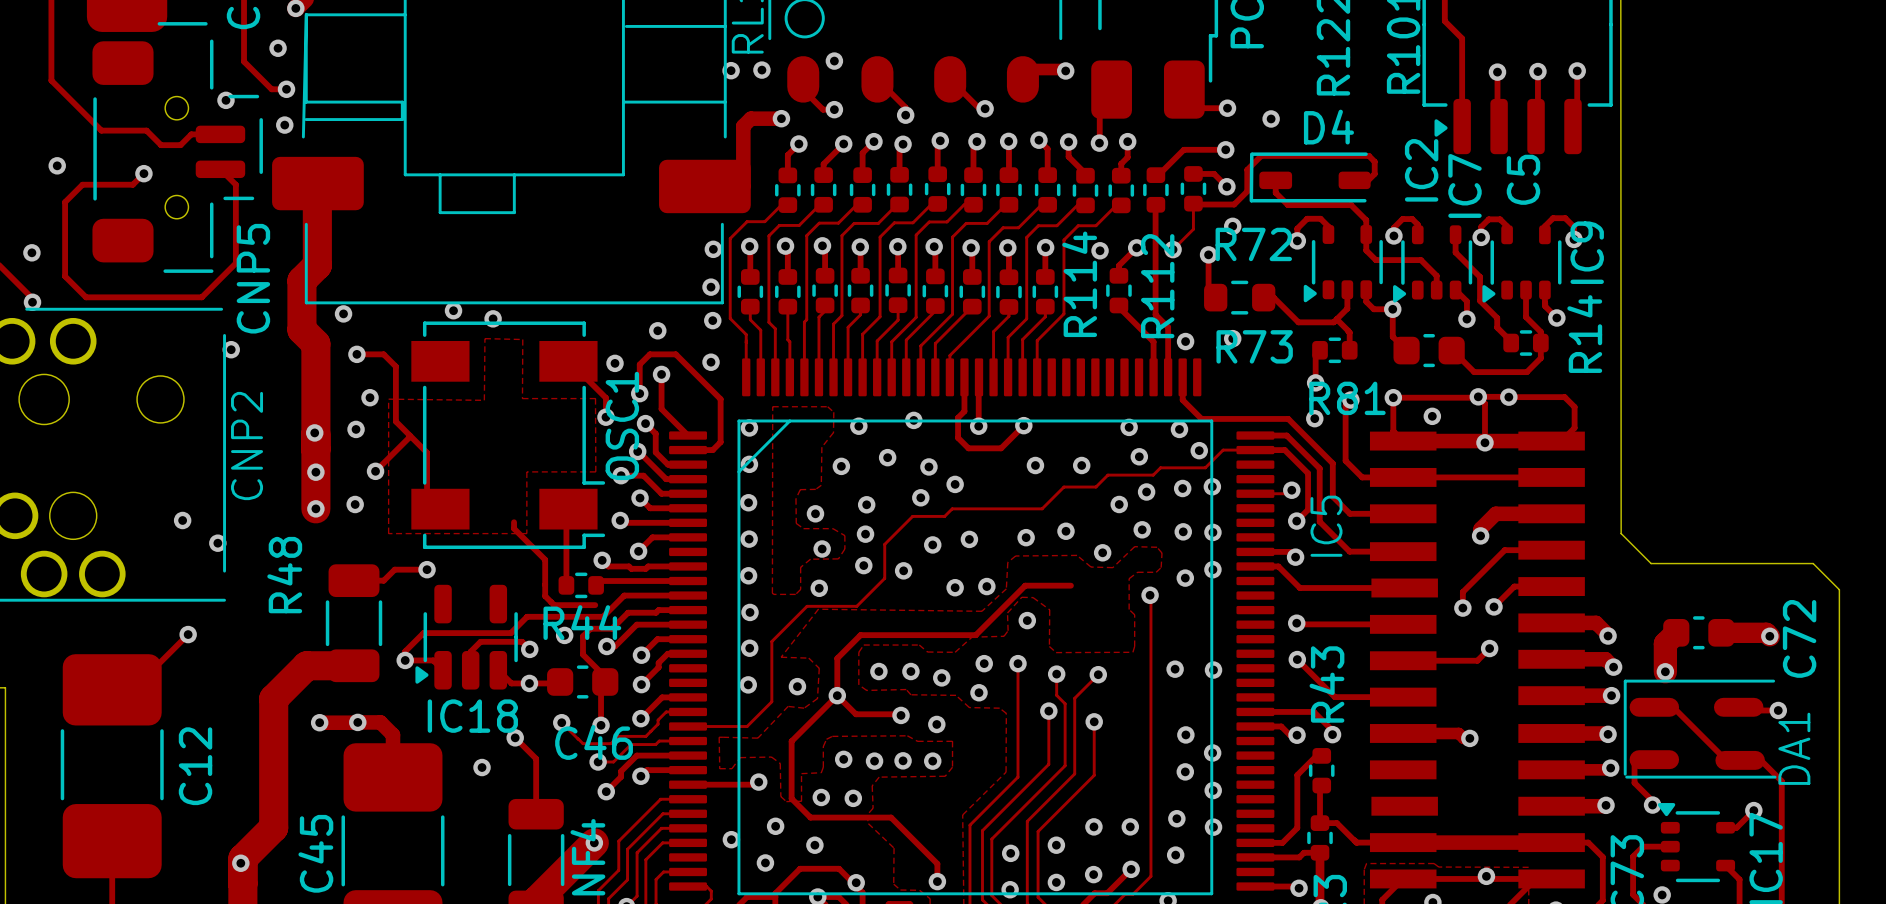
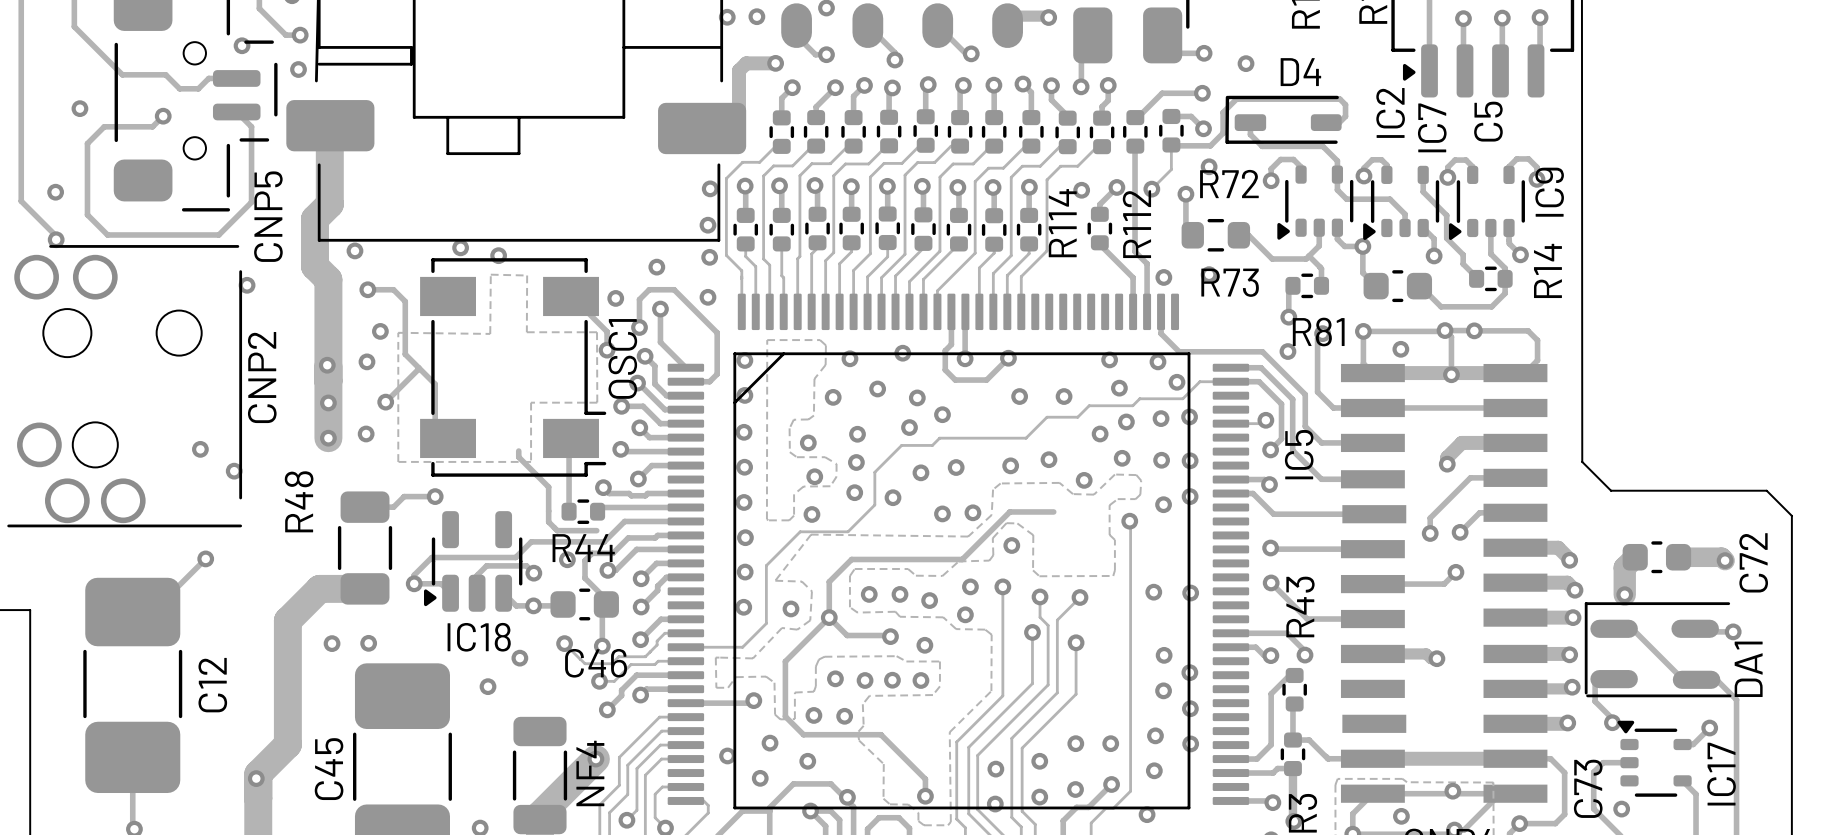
track: (319, 722) (357, 722) -> none
track: (357, 722) (380, 722) (393, 734) (393, 777) -> none
track: (515, 737) (536, 758) (536, 814) -> none

